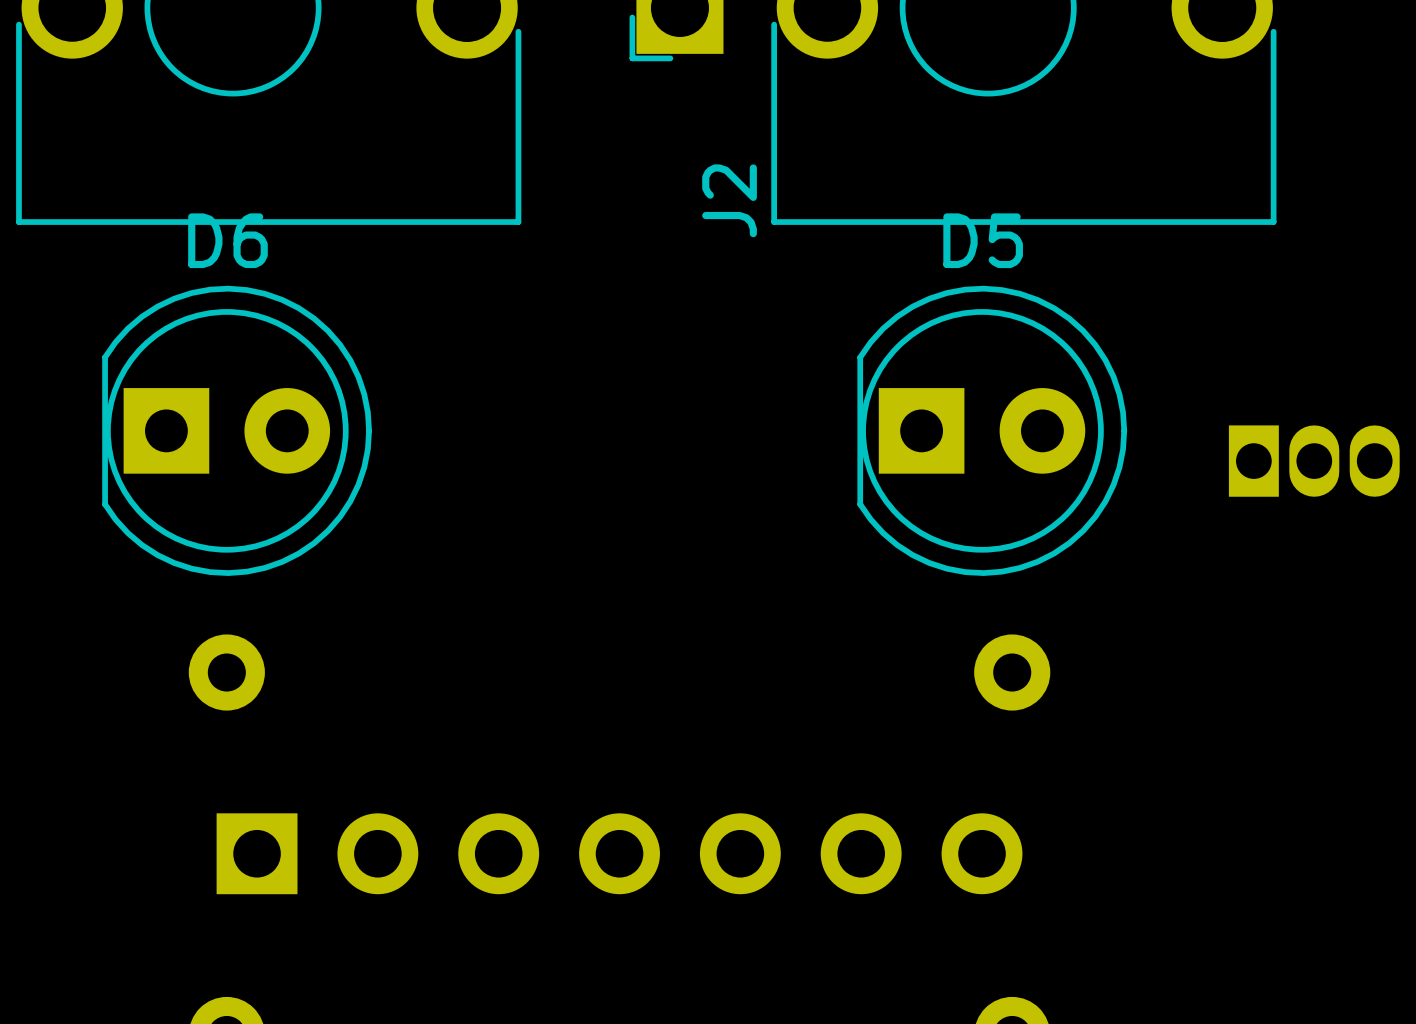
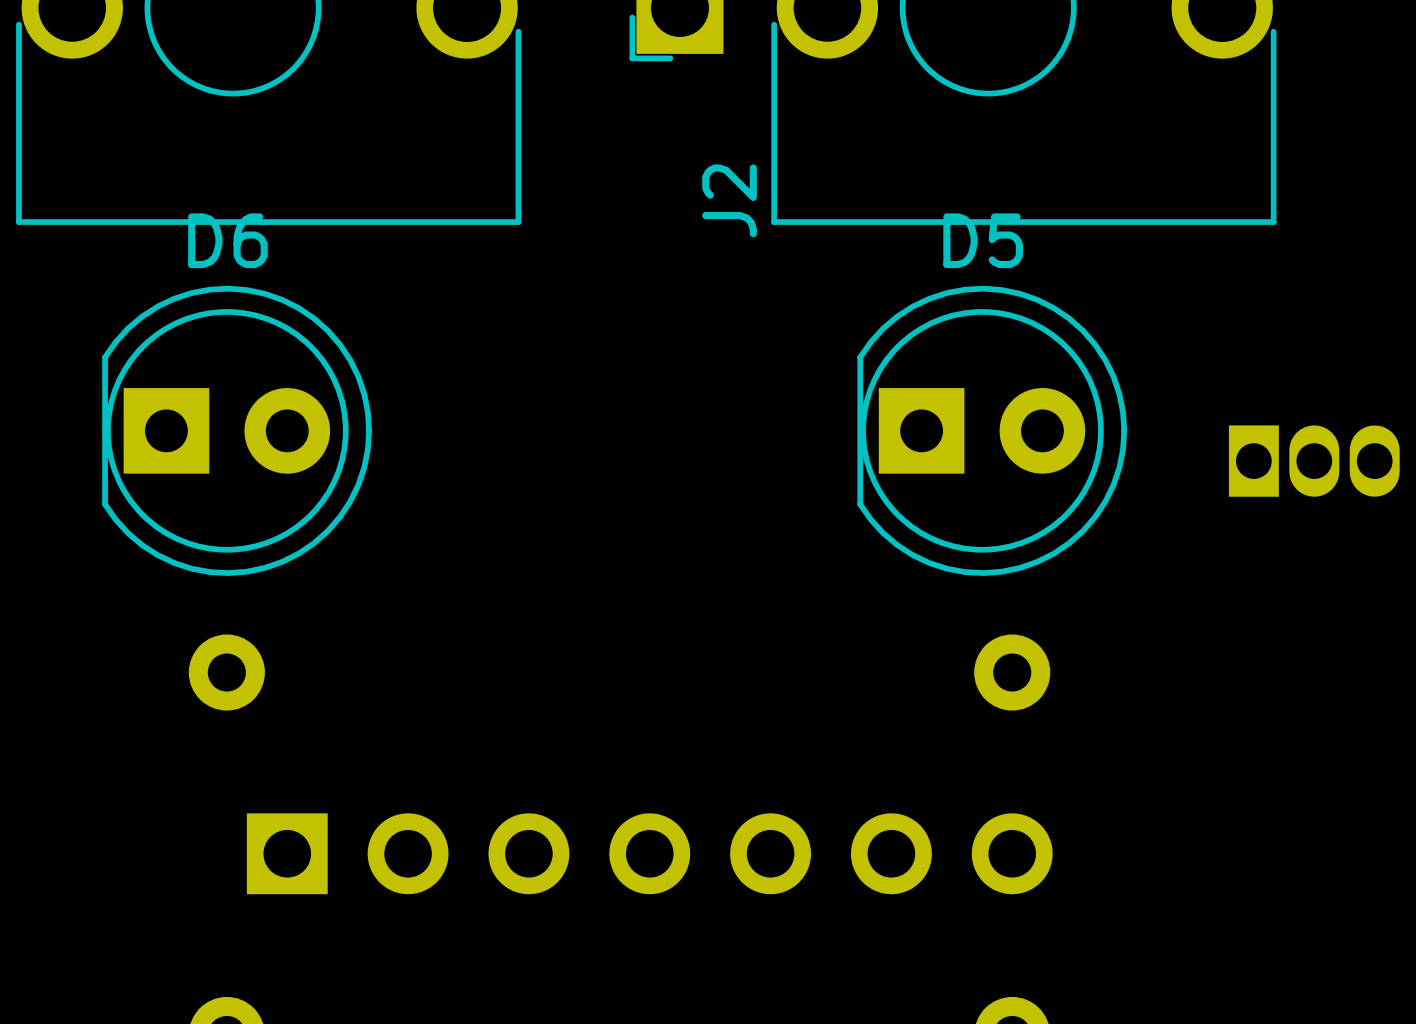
part position: (619, 853) -> (649, 853)

